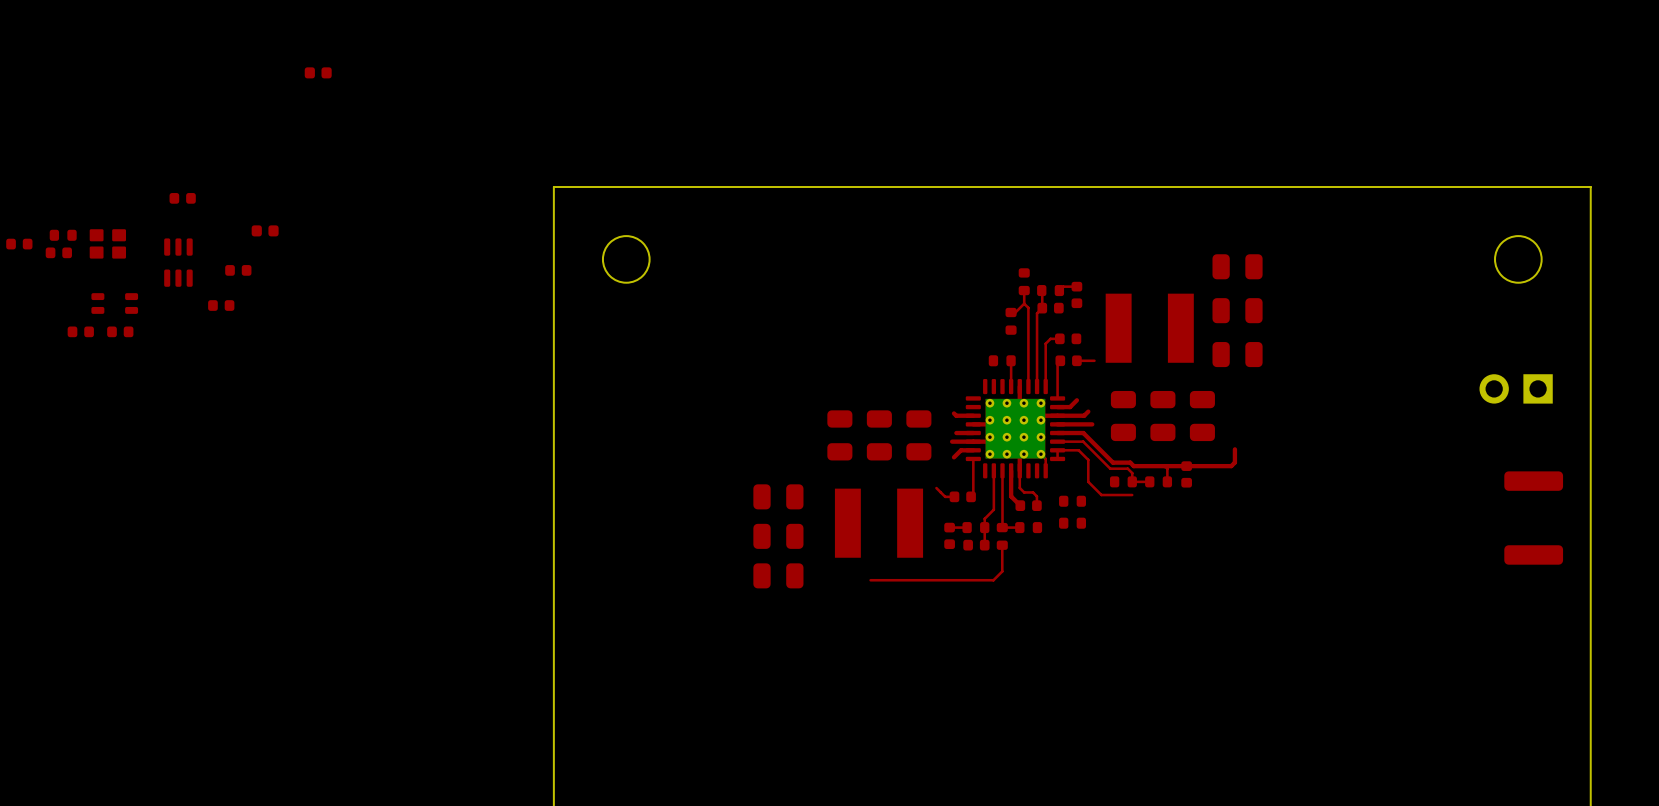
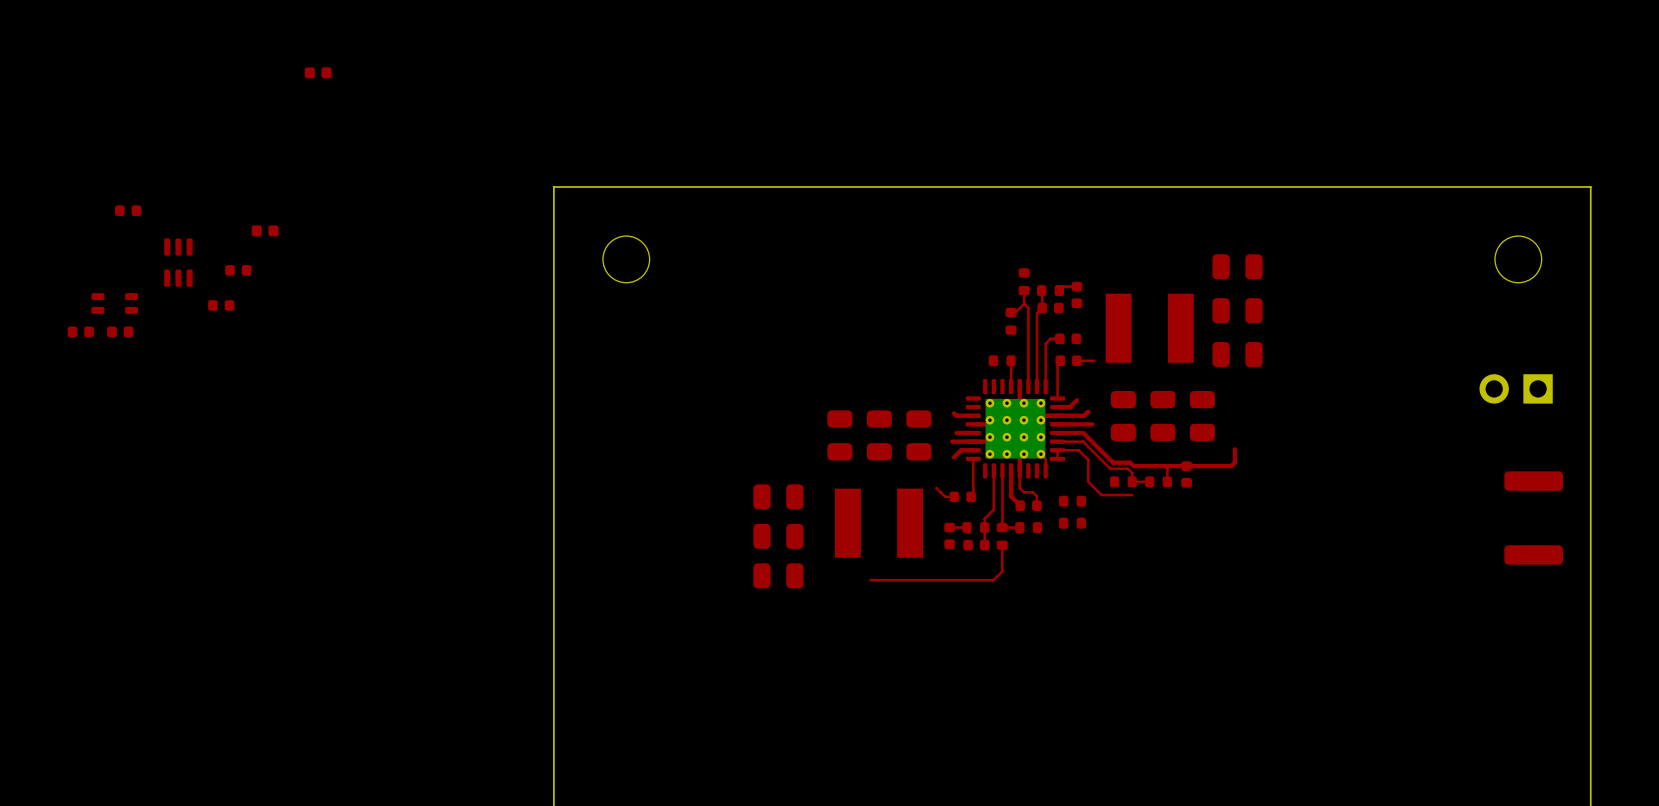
part: (182, 198) -> none
part: none -> (128, 210)
part: (63, 235) -> none
part: (107, 243) -> none
part: (19, 244) -> none
part: (58, 252) -> none

